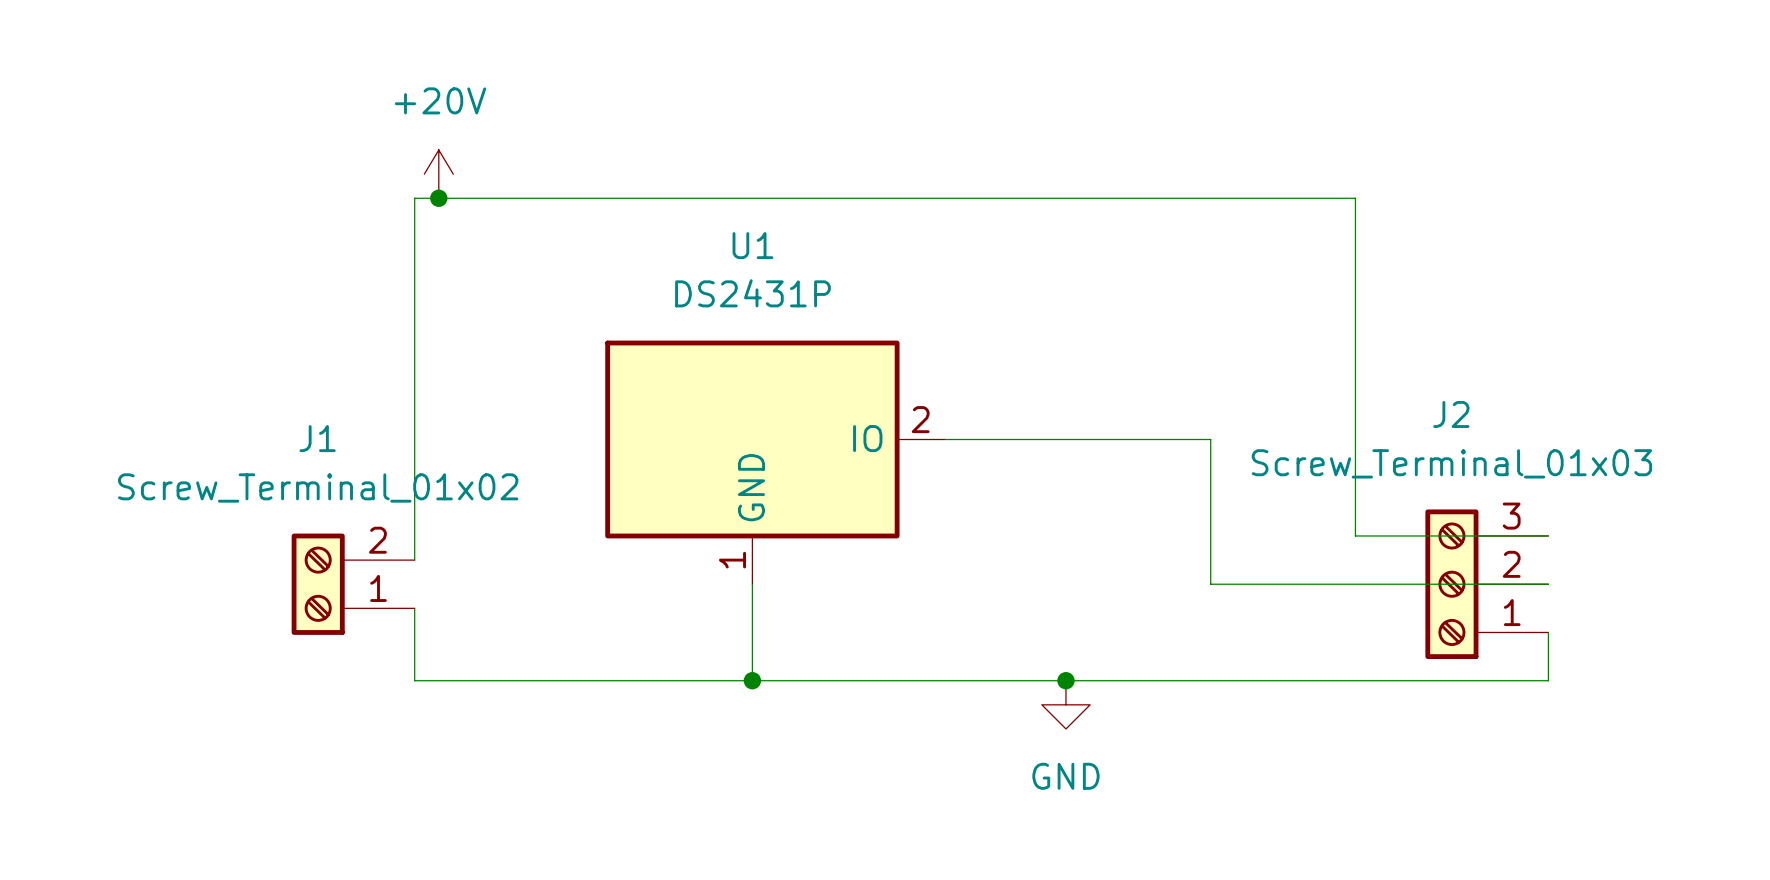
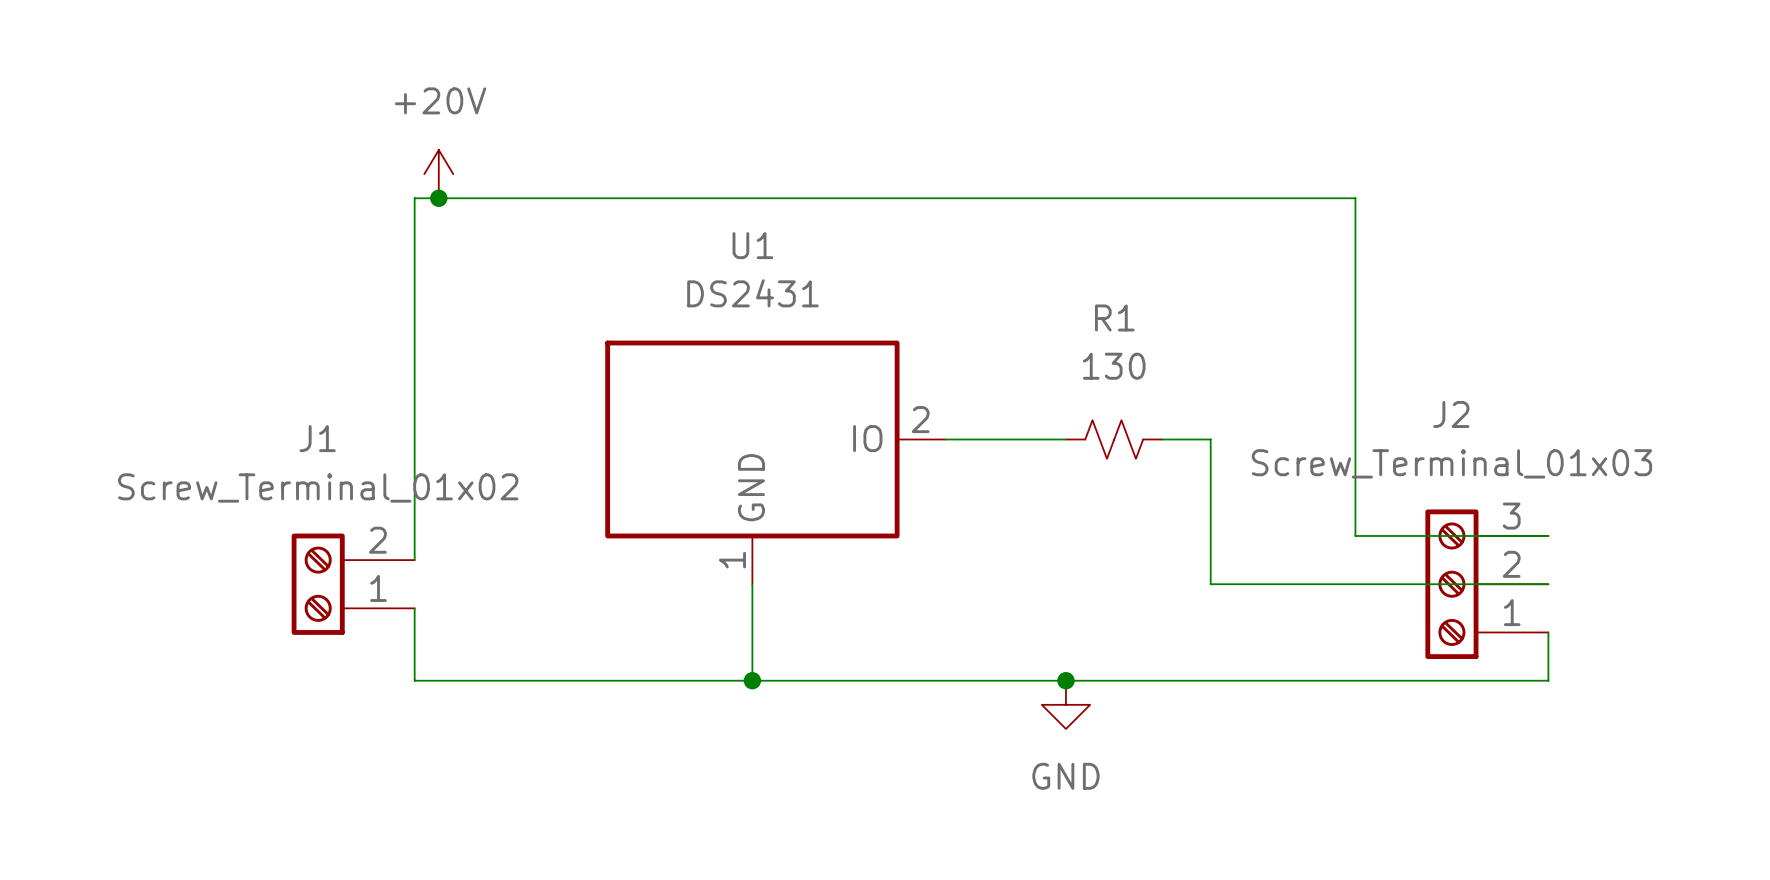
U1 value: DS2431P (752, 293) -> DS2431 (752, 293)
wire: (1065, 439) (1162, 439) -> none
R1: none -> 130 (1114, 439)

